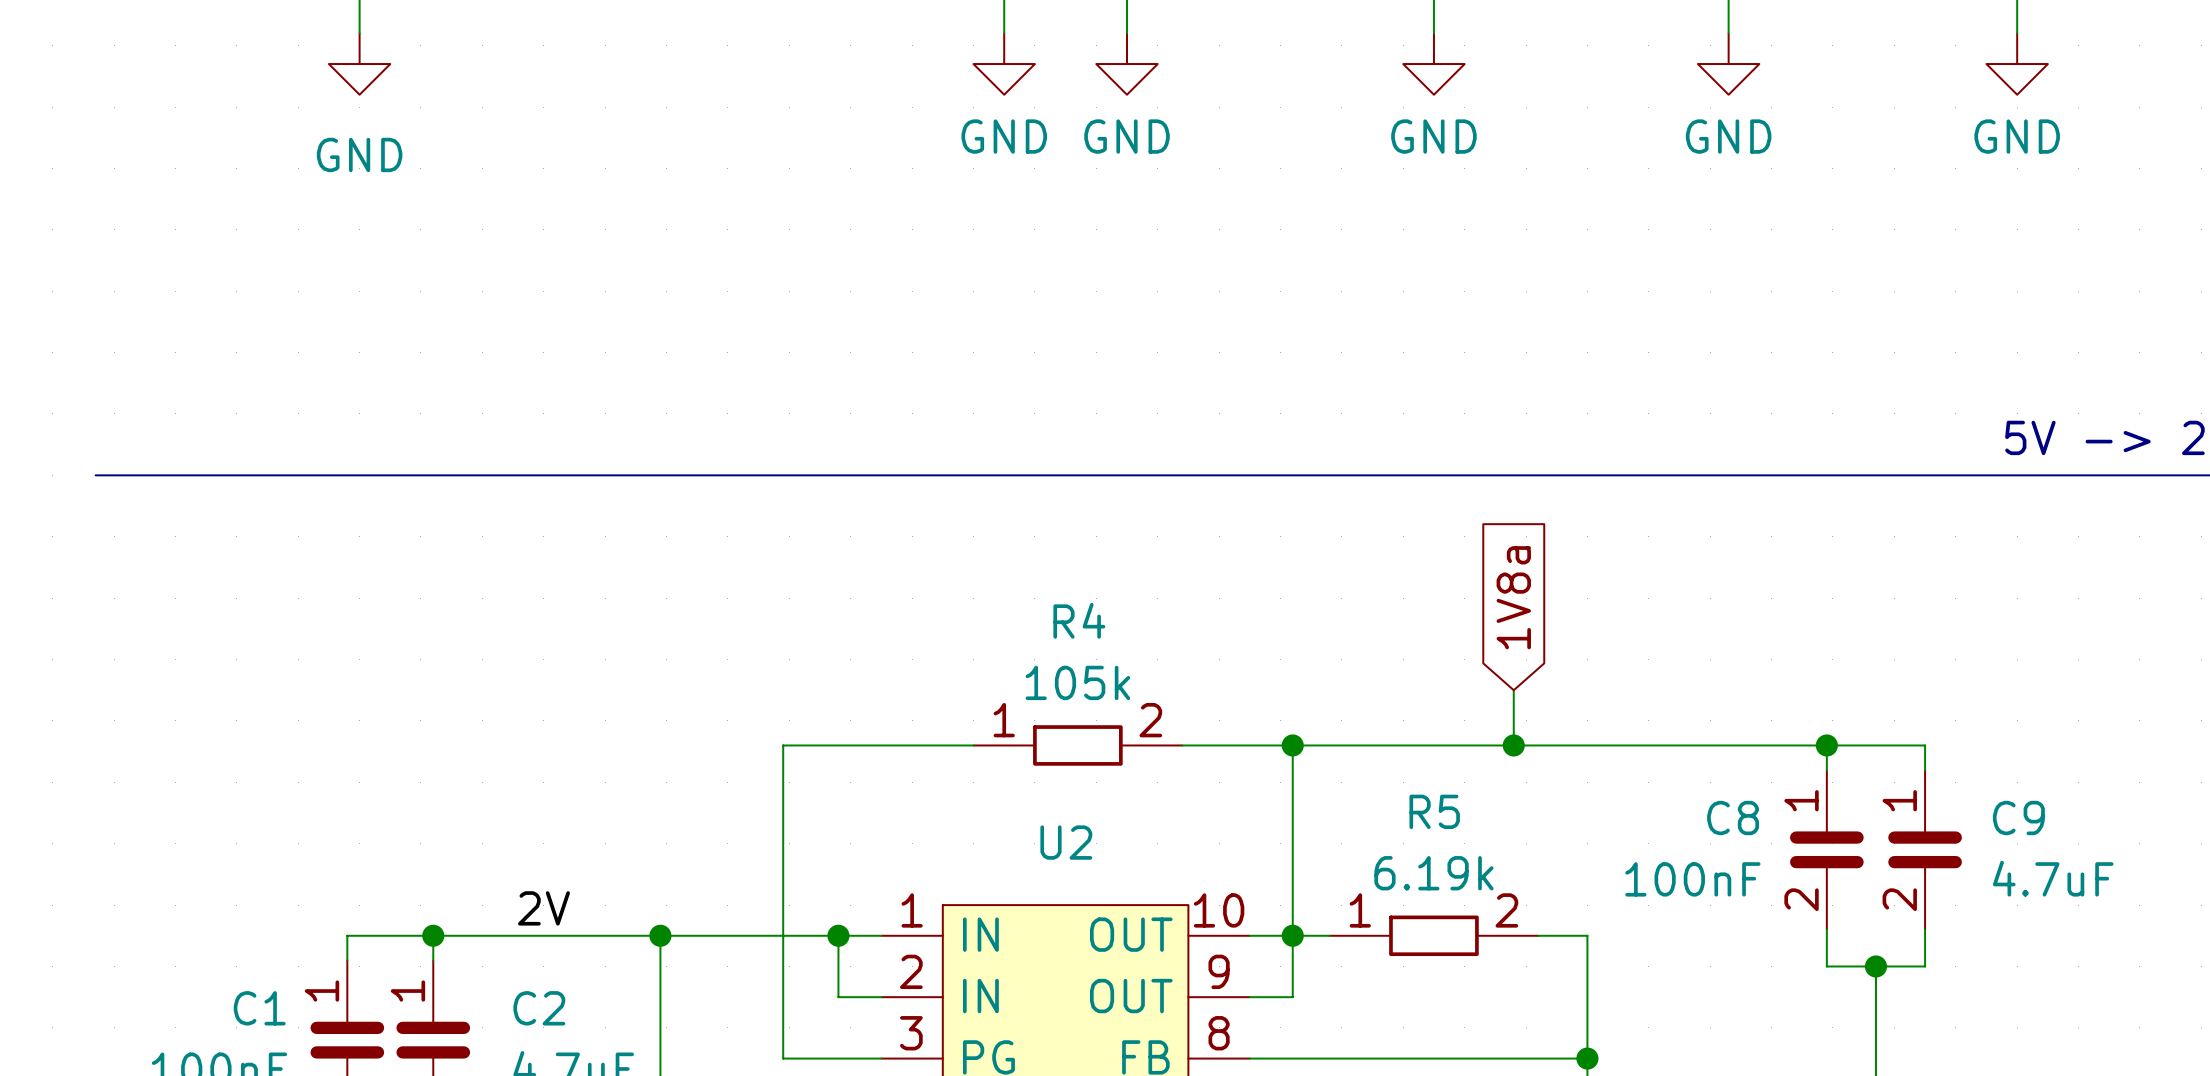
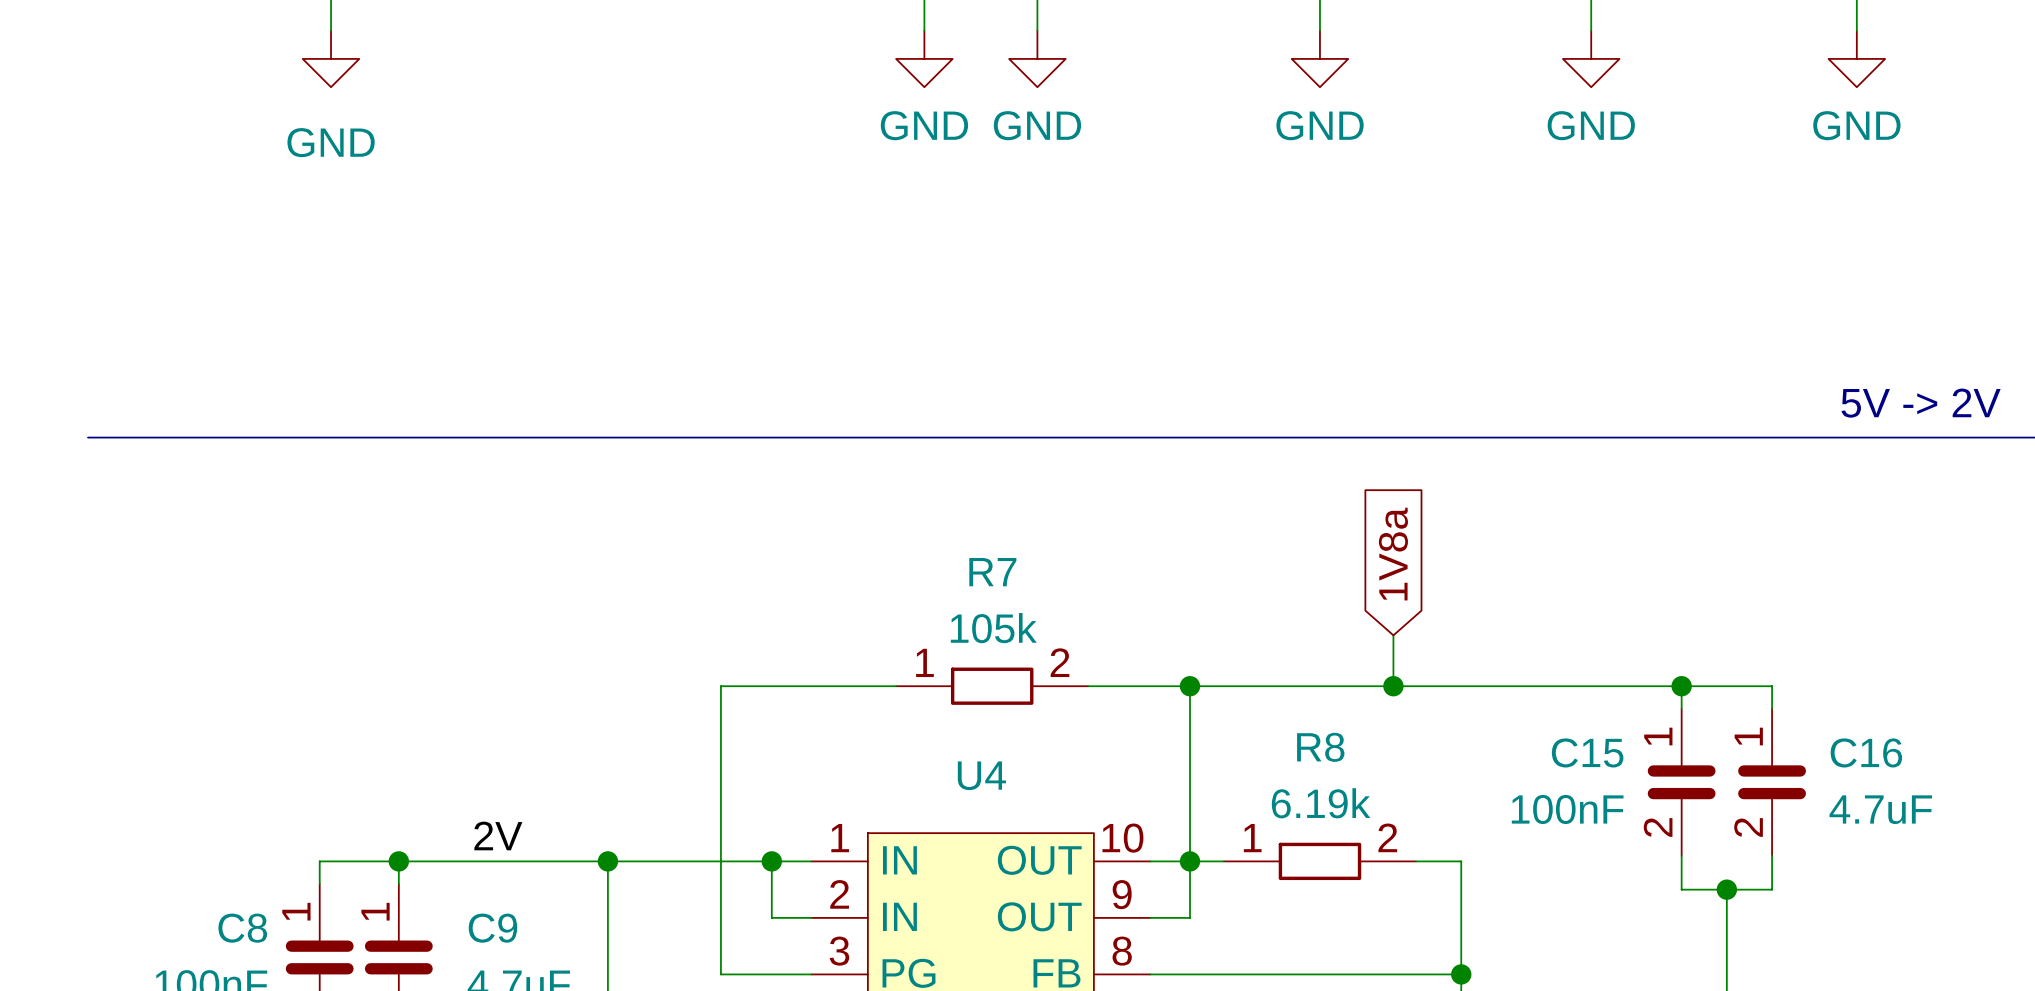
R4 name: R4 (1079, 620) -> R7 (992, 572)
R5 name: R5 (1434, 811) -> R8 (1320, 747)
C8 name: C8 (1733, 817) -> C15 (1587, 752)
C9 name: C9 (2018, 817) -> C16 (1866, 752)
U2 name: U2 (1066, 842) -> U4 (981, 775)
C1 name: C1 (259, 1008) -> C8 (242, 928)
C2 name: C2 (539, 1008) -> C9 (492, 928)

